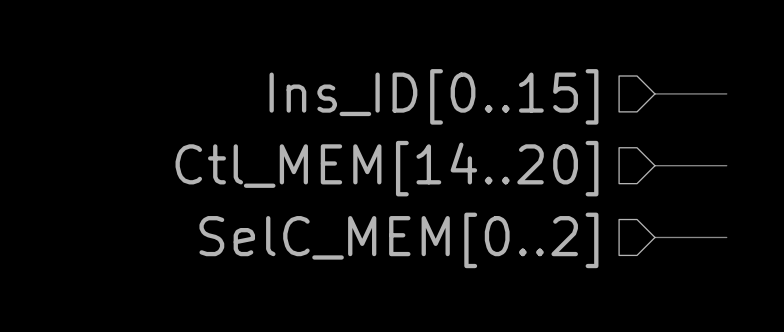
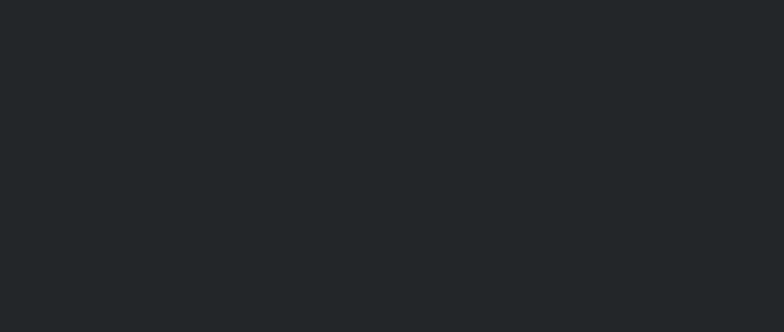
bus: (654, 93) (726, 93) -> none
hierarchical label: Ins_ID[0..15] (433, 96) -> none
bus: (654, 165) (726, 165) -> none
hierarchical label: Ctl_MEM[14..20] (386, 168) -> none
bus: (654, 237) (726, 237) -> none
hierarchical label: SelC_MEM[0..2] (398, 240) -> none

